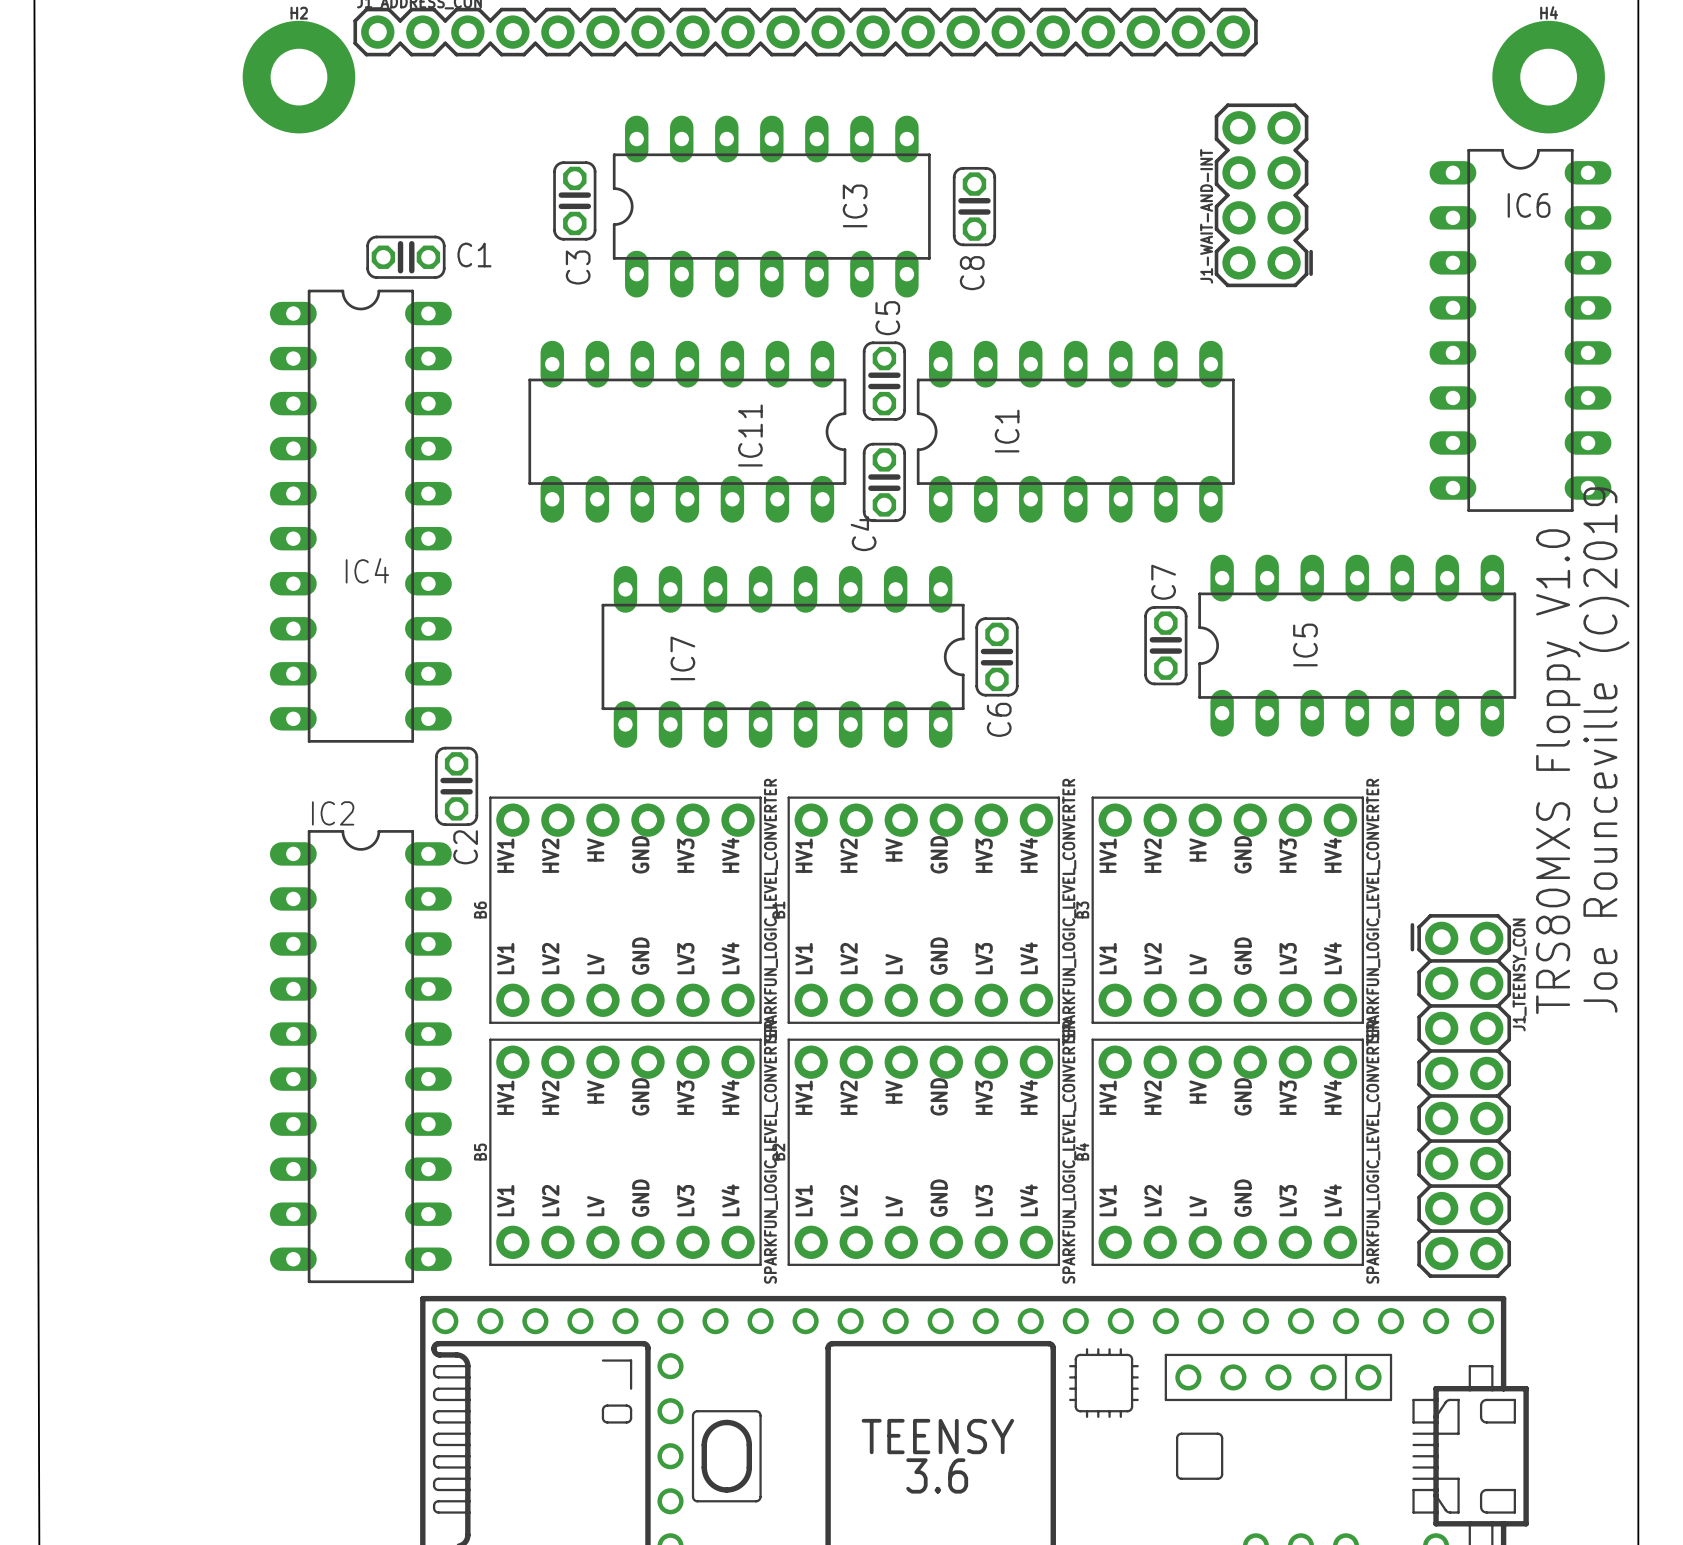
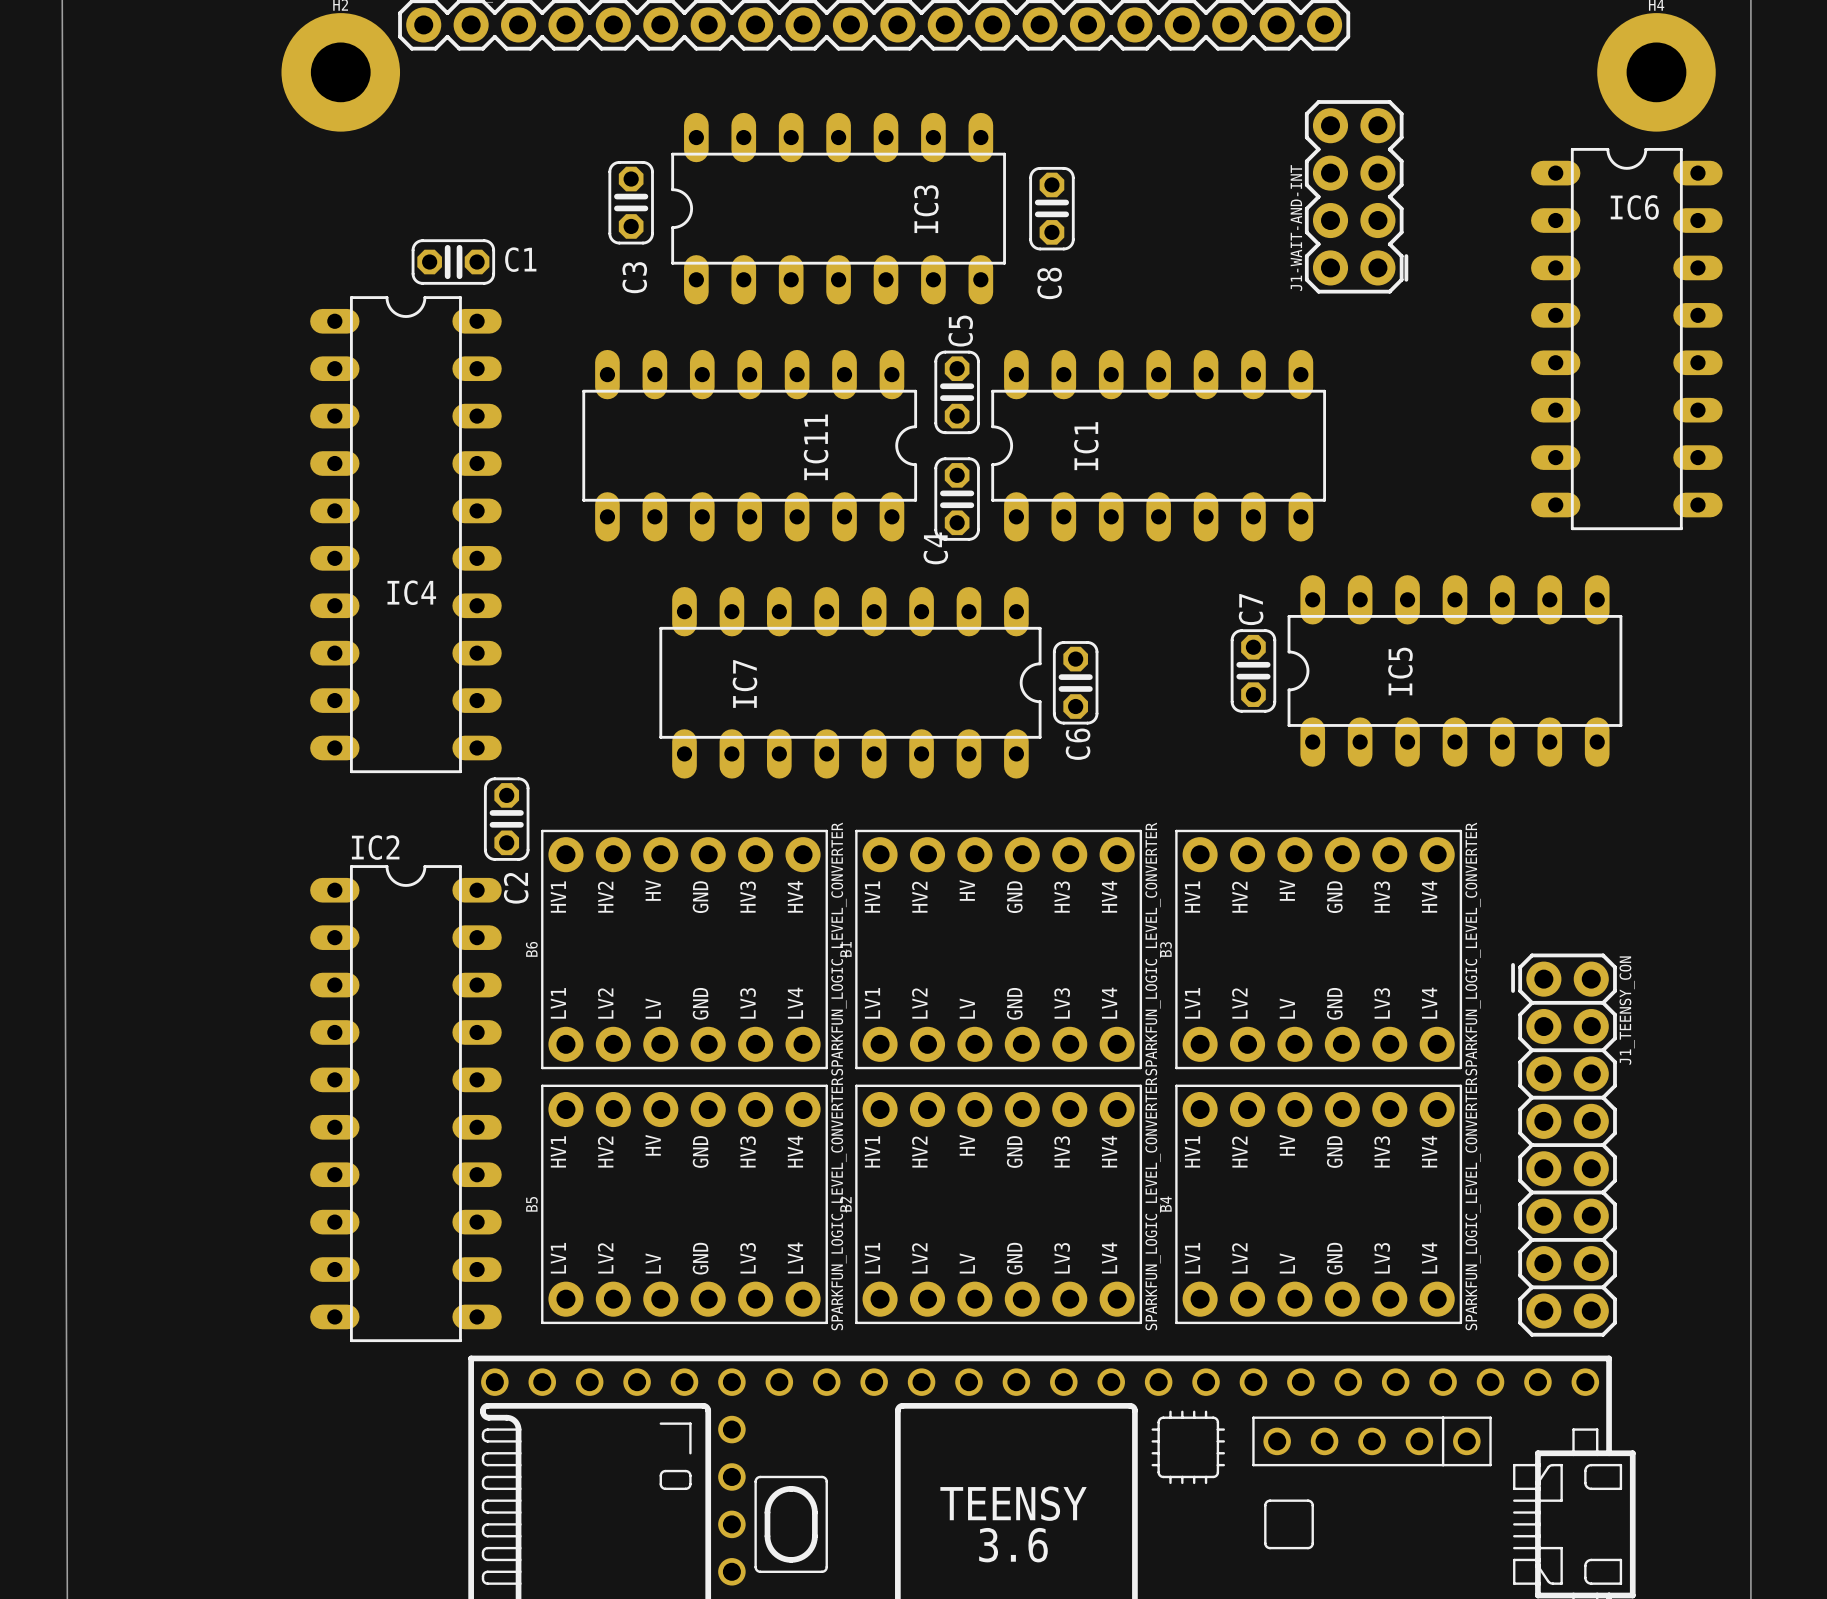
text: Joe Rounceville (C)2019 (1604, 750) -> none
text: TRS80MXS Floppy V1.0 (1558, 771) -> none

